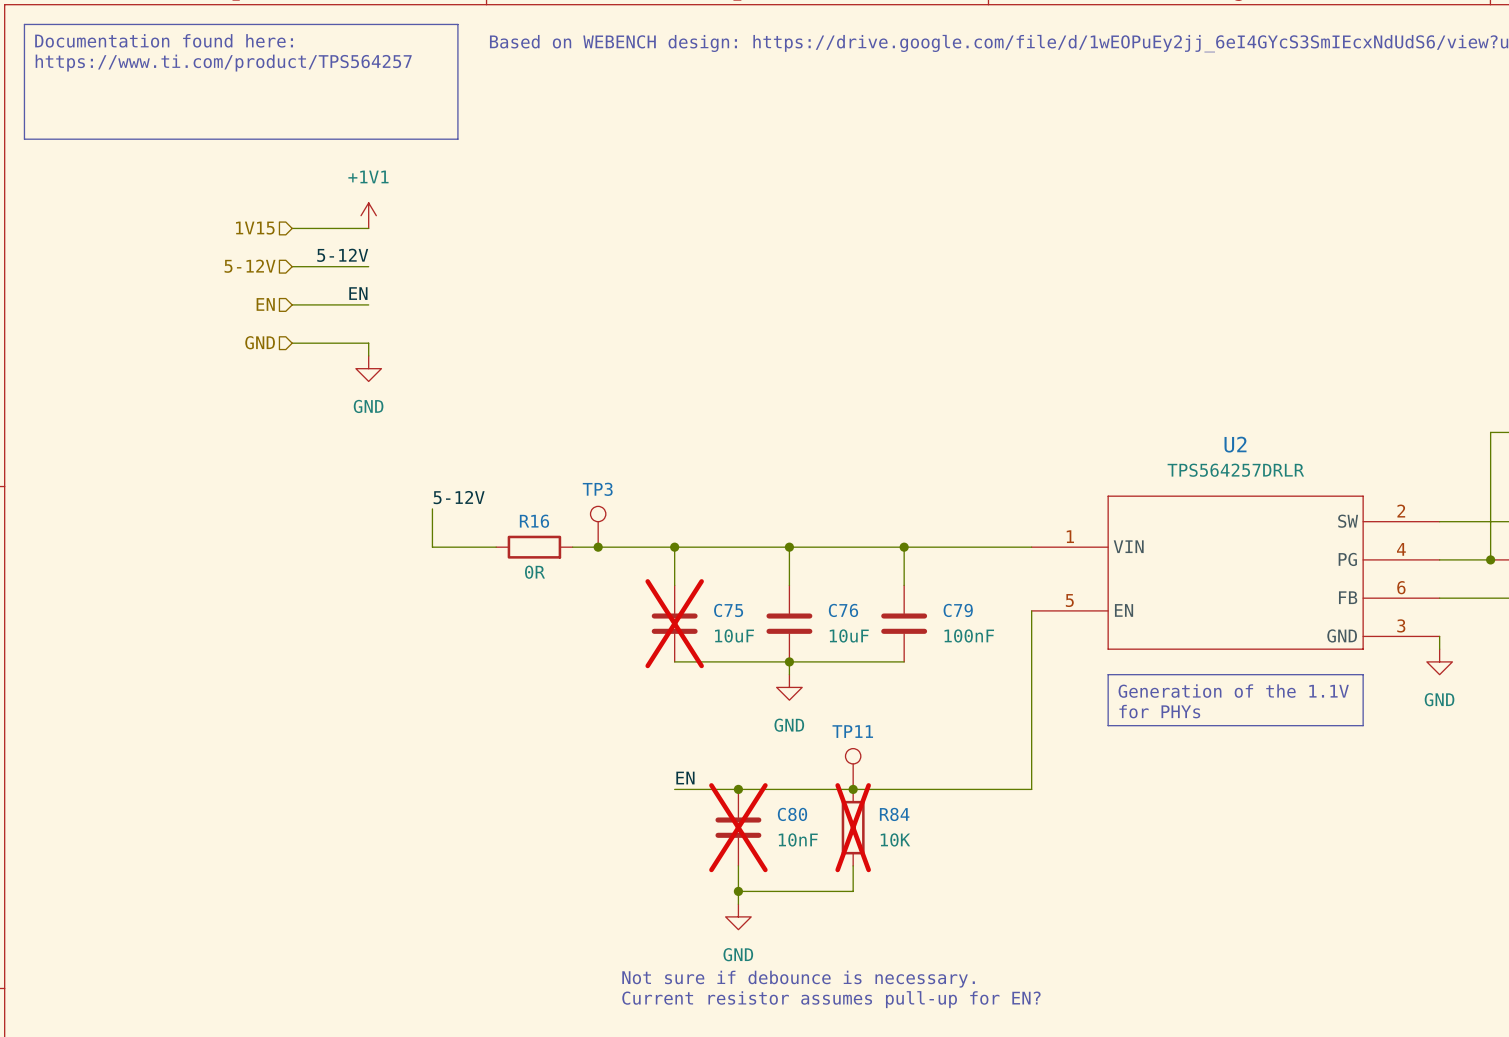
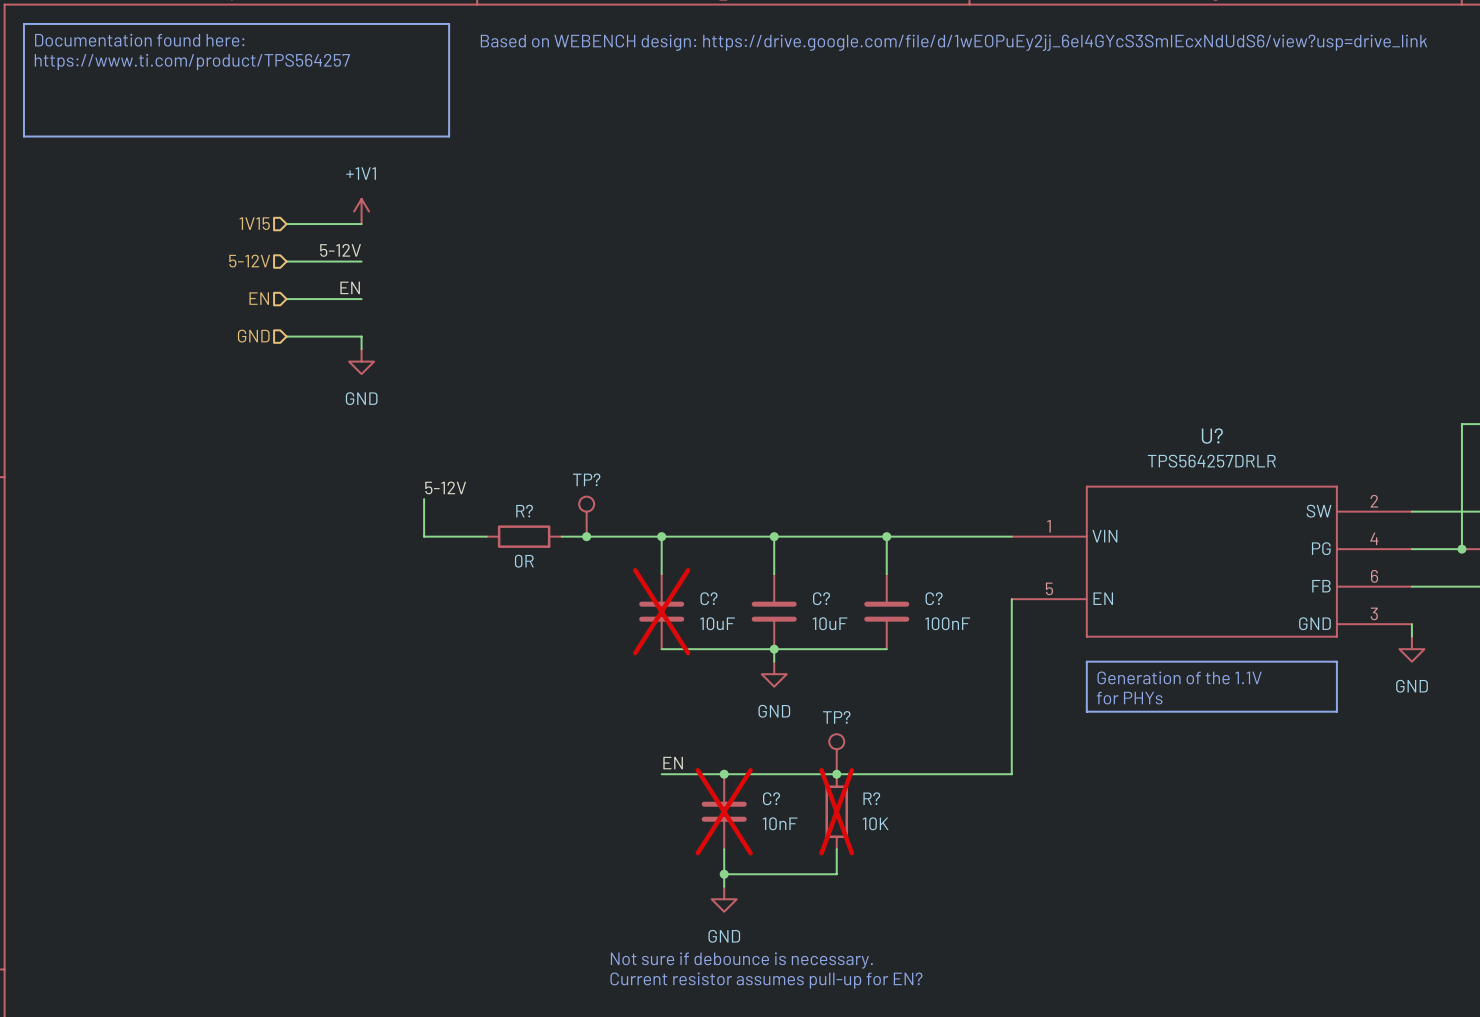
U2 name: U2 (1235, 444) -> U? (1212, 436)
TP3 name: TP3 (597, 489) -> TP? (586, 479)
R16 name: R16 (534, 521) -> R? (524, 511)
C75 name: C75 (728, 610) -> C? (708, 598)
C76 name: C76 (843, 610) -> C? (821, 598)
C79 name: C79 (958, 610) -> C? (934, 598)
TP11 name: TP11 (852, 731) -> TP? (836, 717)
C80 name: C80 (792, 814) -> C? (771, 798)
R84 name: R84 (894, 814) -> R? (871, 798)

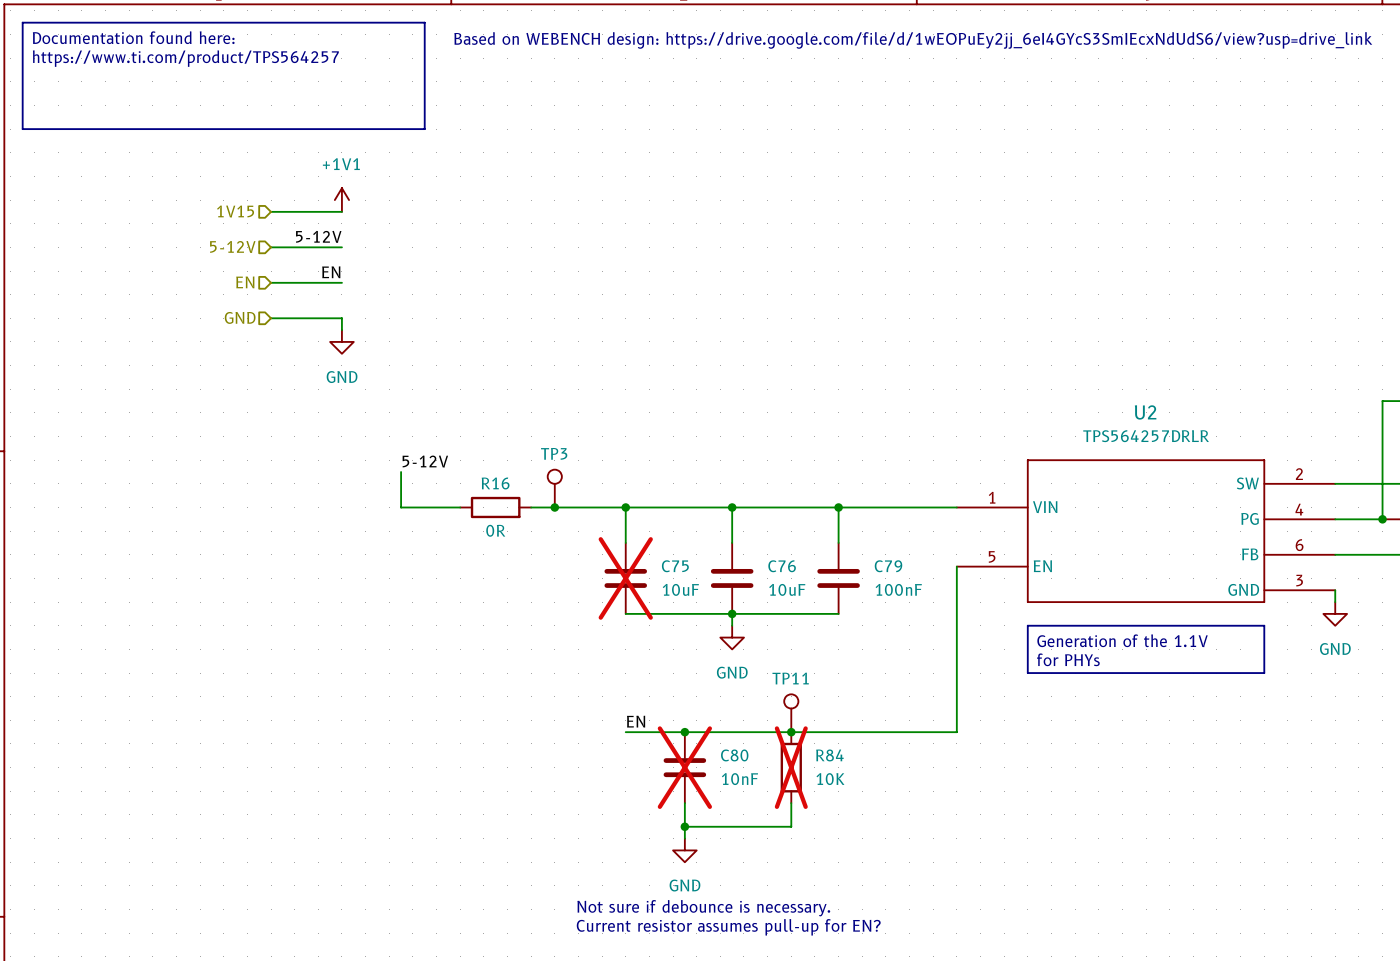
U? name: U? (1212, 436) -> U2 (1145, 412)
TP? name: TP? (586, 479) -> TP3 (554, 453)
R? name: R? (524, 511) -> R16 (495, 483)
C? name: C? (708, 598) -> C75 (675, 566)
C? name: C? (821, 598) -> C76 (782, 566)
C? name: C? (934, 598) -> C79 (888, 566)
TP? name: TP? (836, 717) -> TP11 (790, 678)
C? name: C? (771, 798) -> C80 (734, 755)
R? name: R? (871, 798) -> R84 (829, 755)

